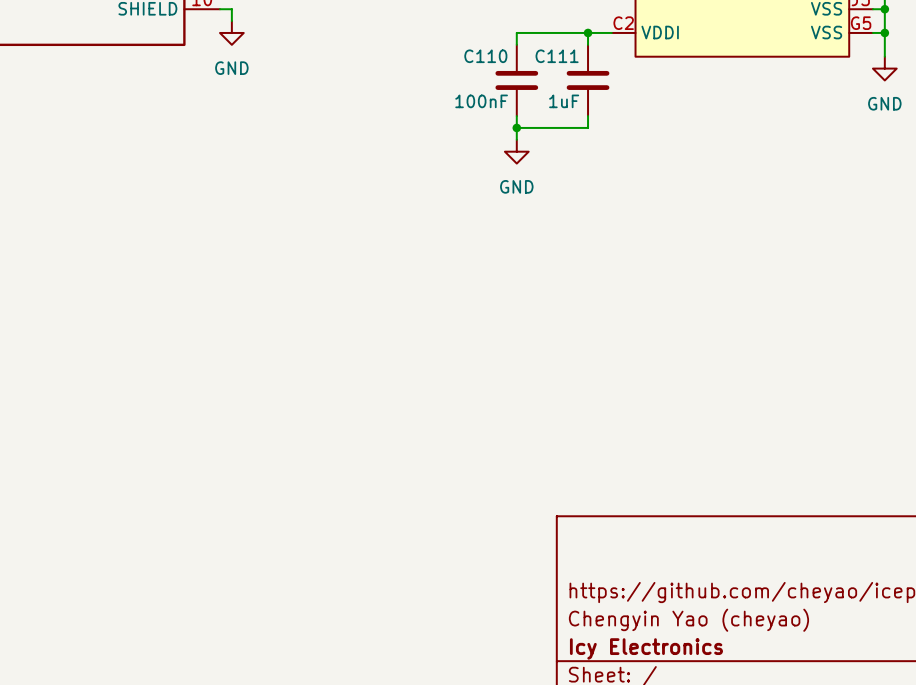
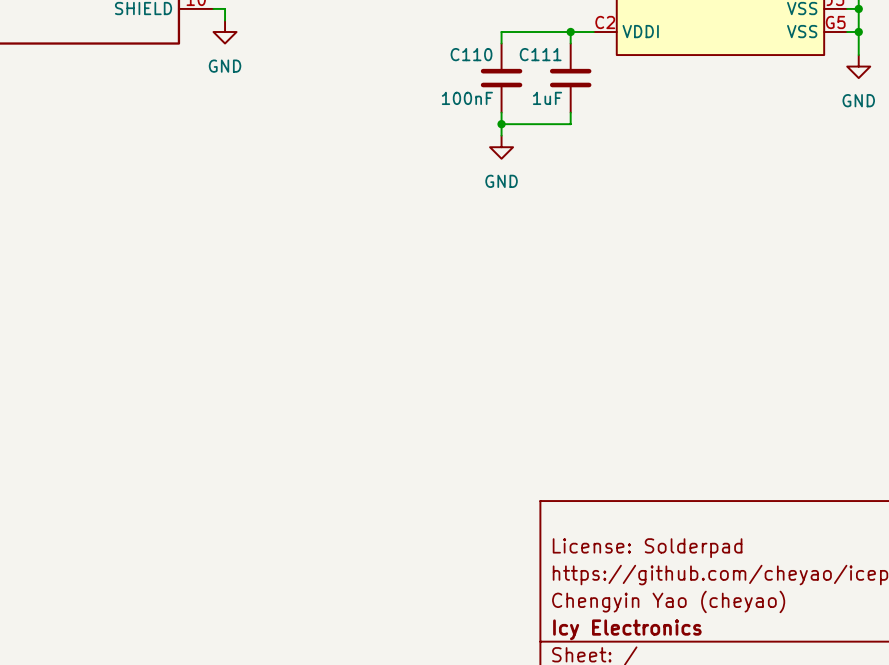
title block: none -> License: Solderpad (647, 548)

